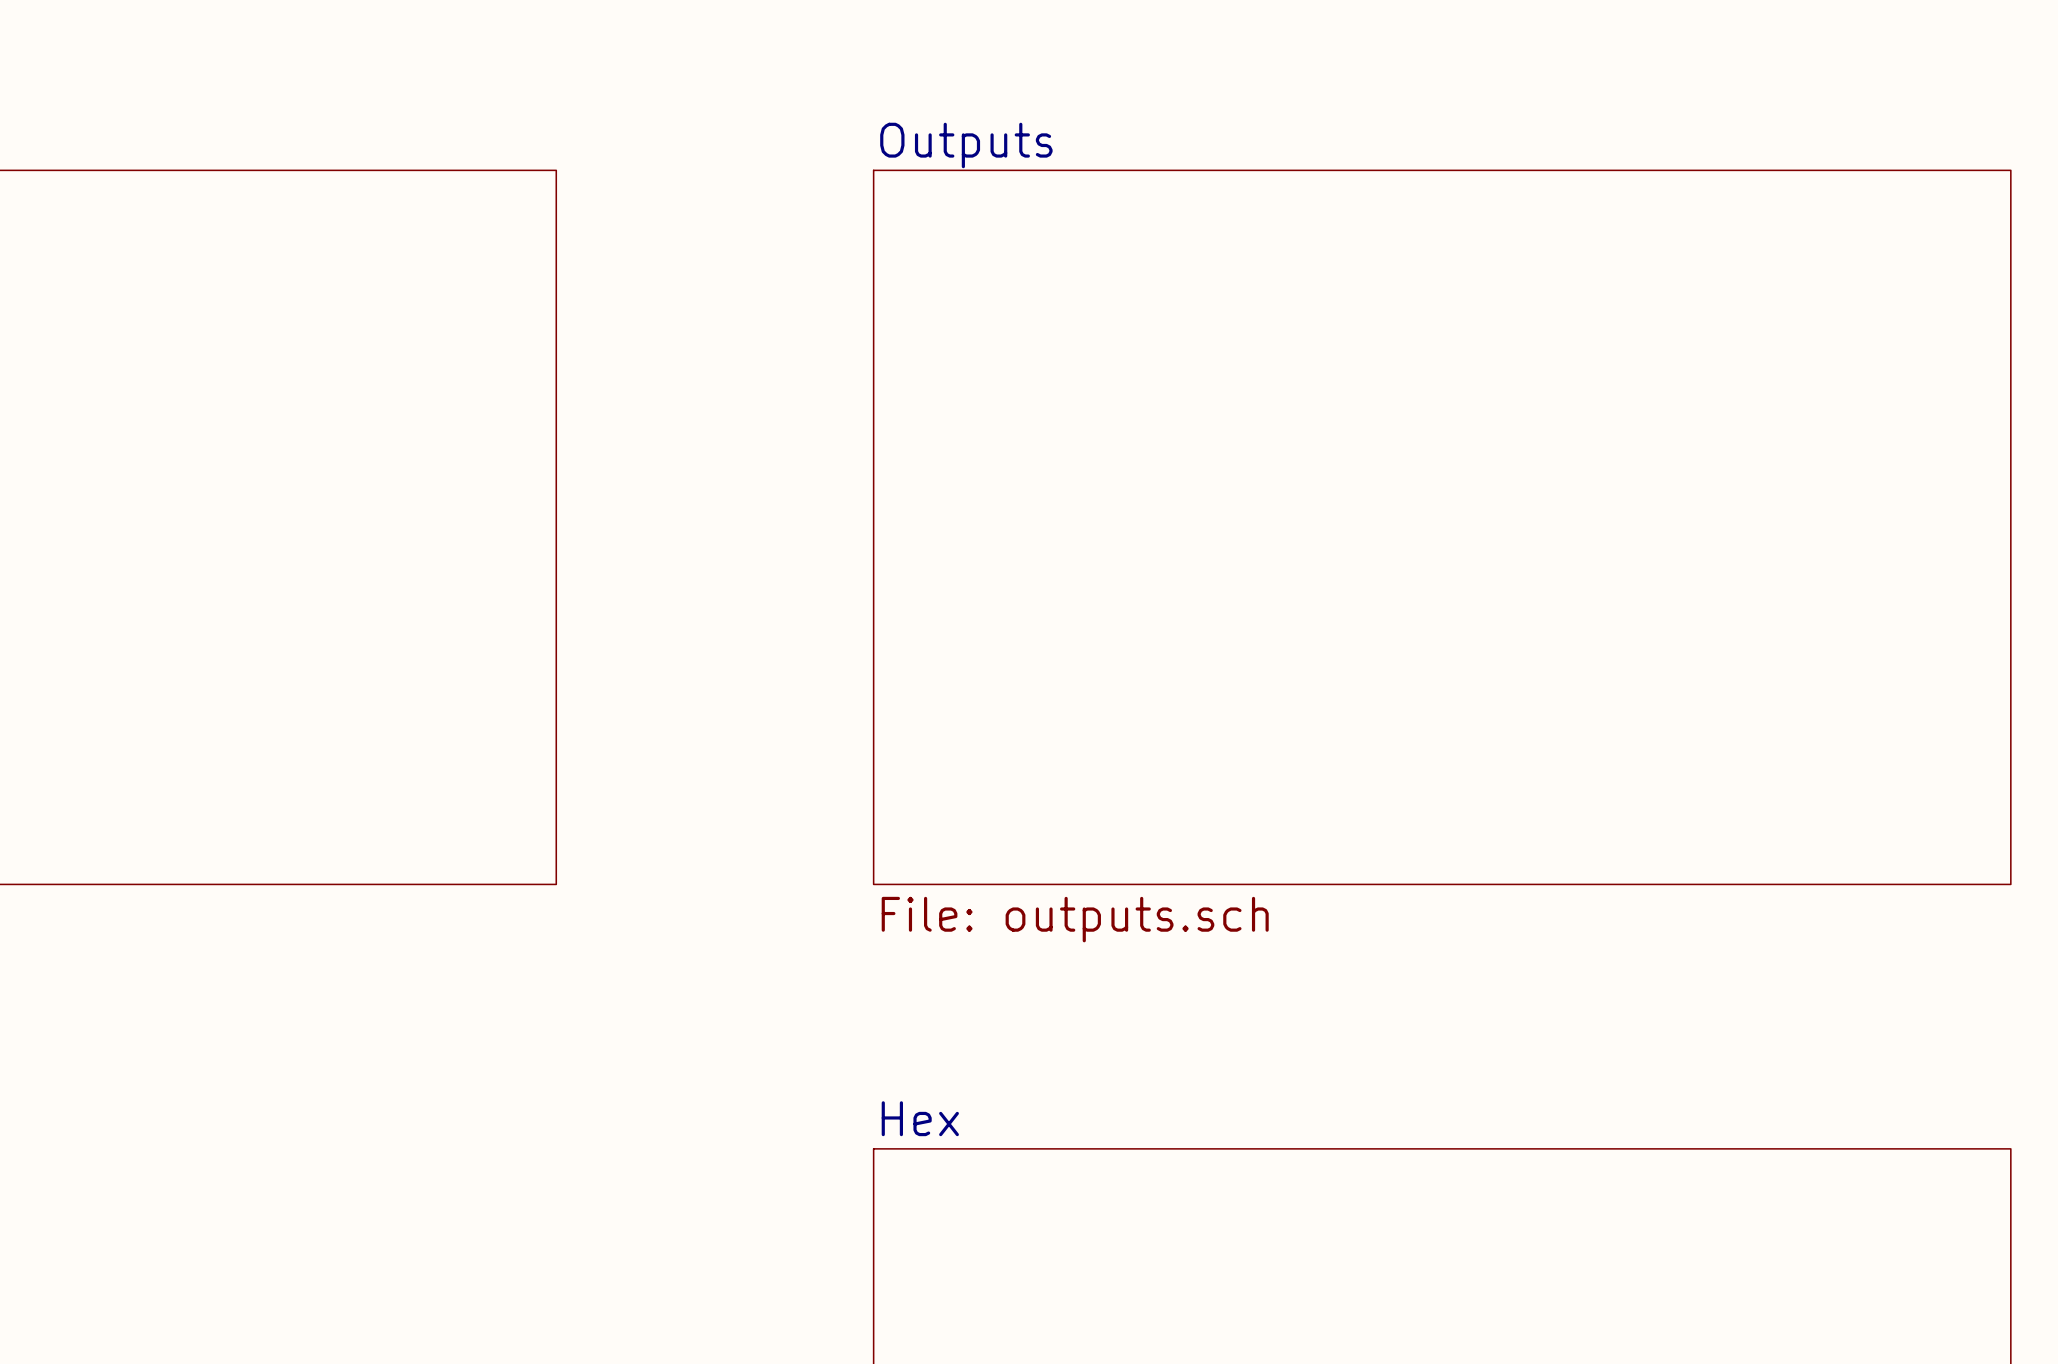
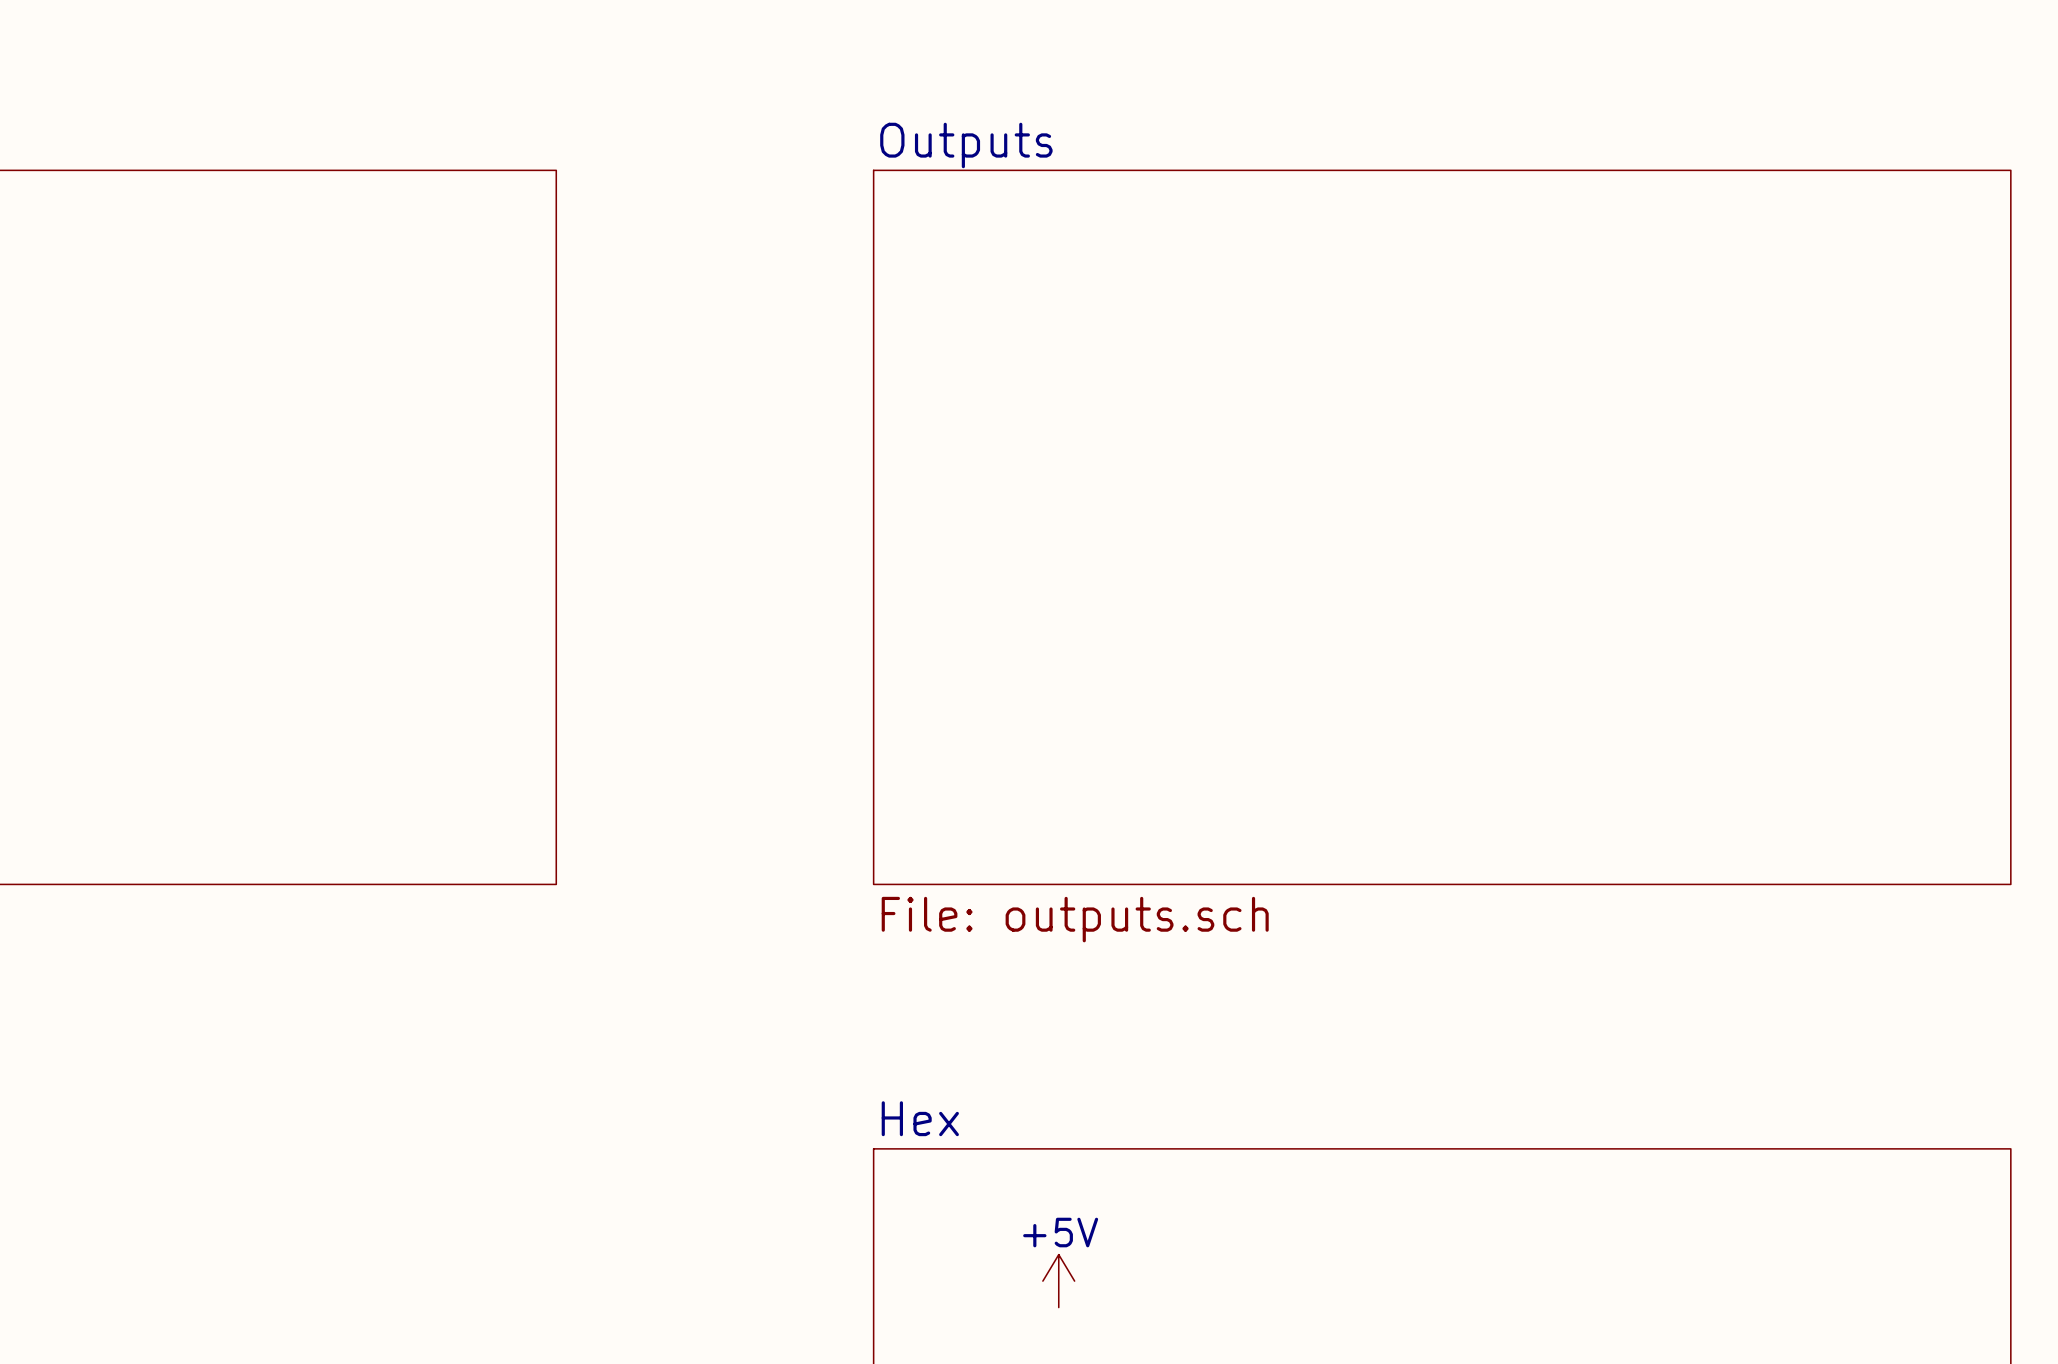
power symbol: none -> +5V (1058, 1281)

